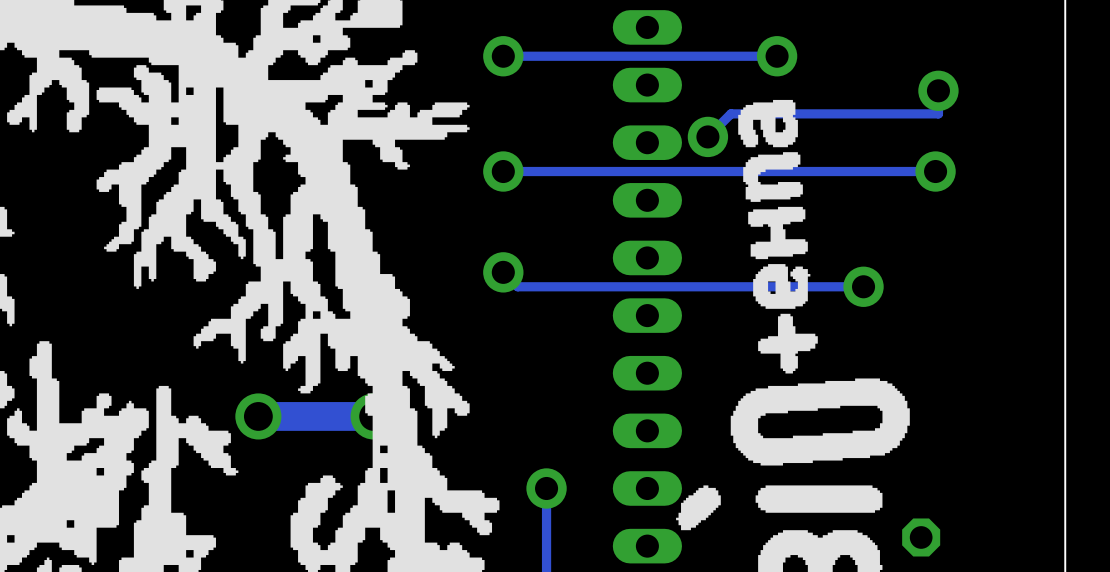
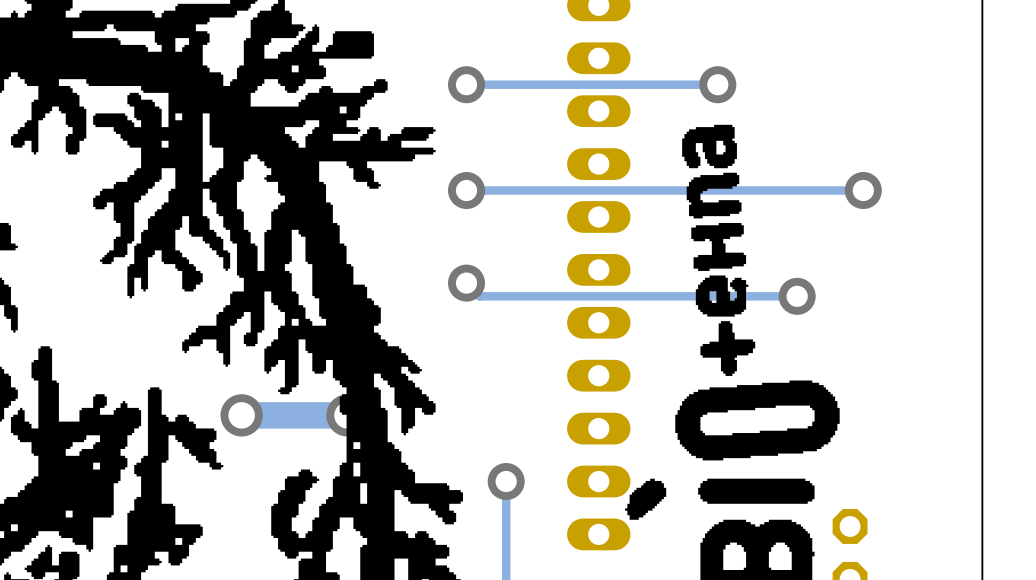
track: (938, 90) (938, 113) (730, 113) (707, 136) -> none
via: (938, 90) -> none
via: (707, 136) -> none

